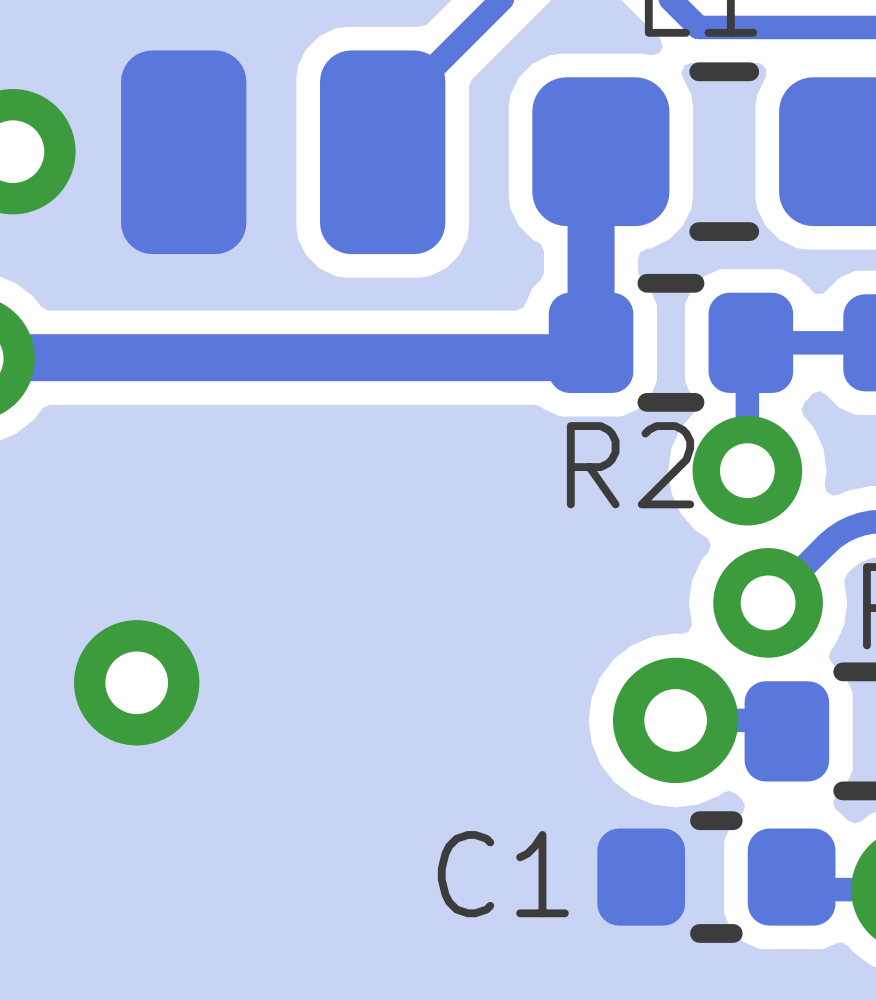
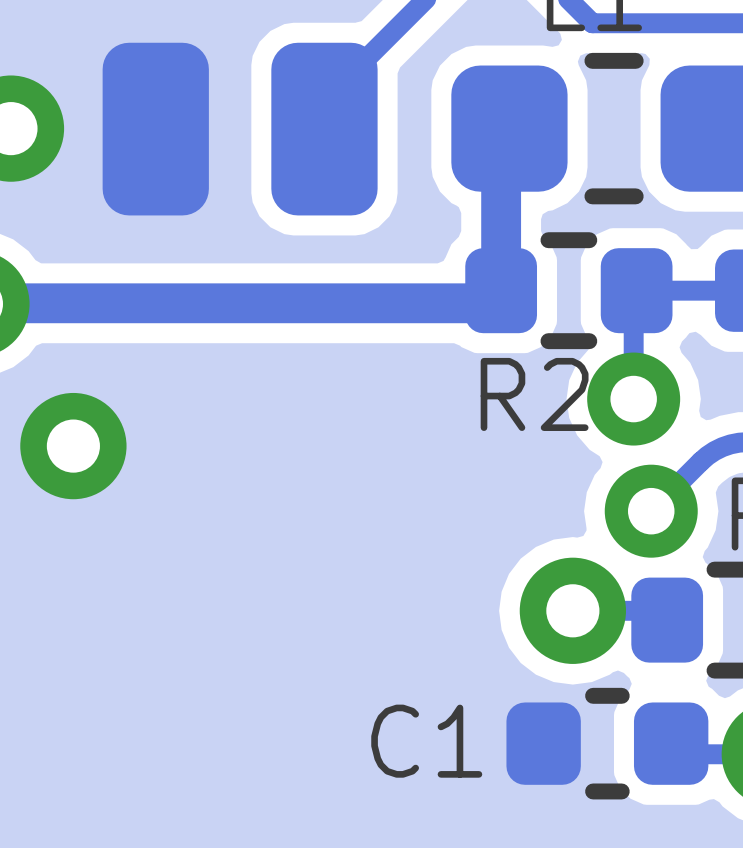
via position: (136, 682) -> (73, 446)

